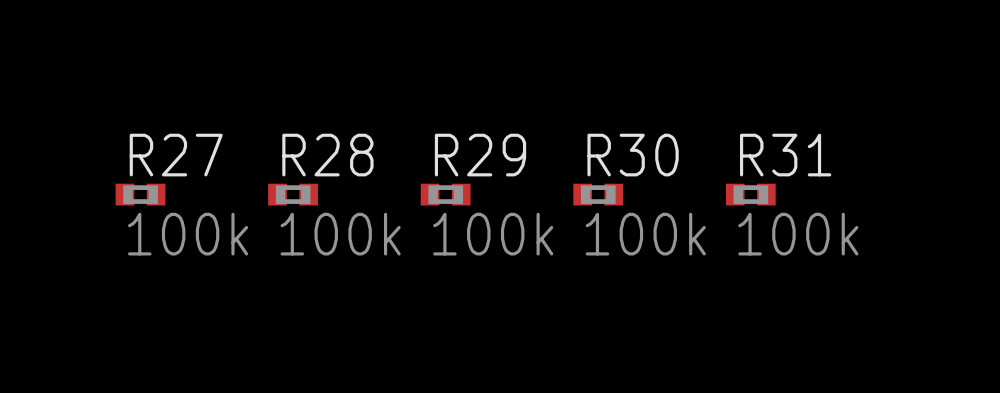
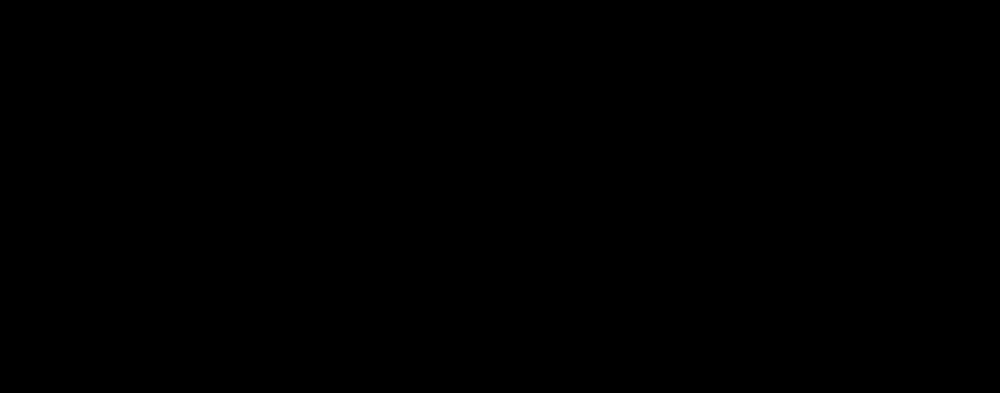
R27: 100k (140, 194) -> none
R28: 100k (293, 194) -> none
R29: 100k (445, 194) -> none
R30: 100k (598, 194) -> none
R31: 100k (750, 194) -> none

